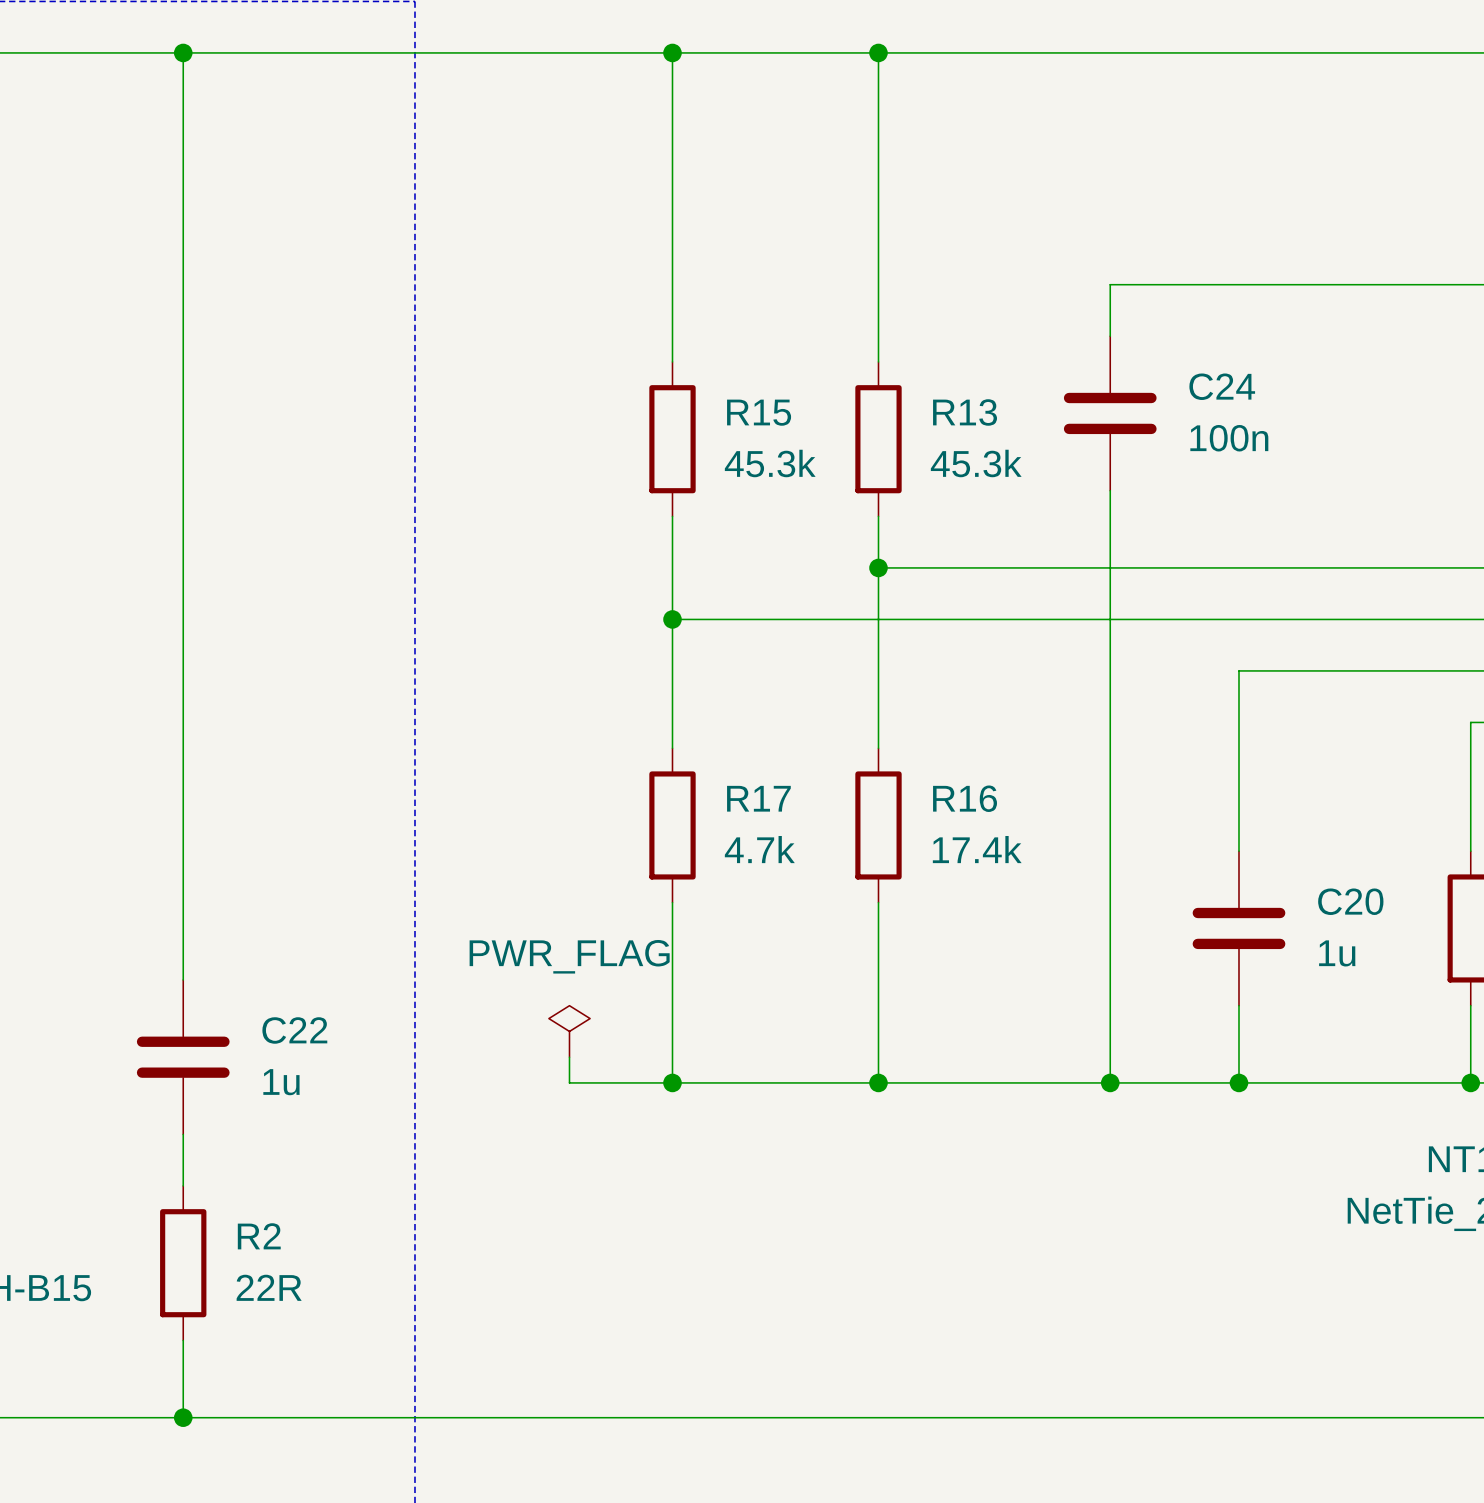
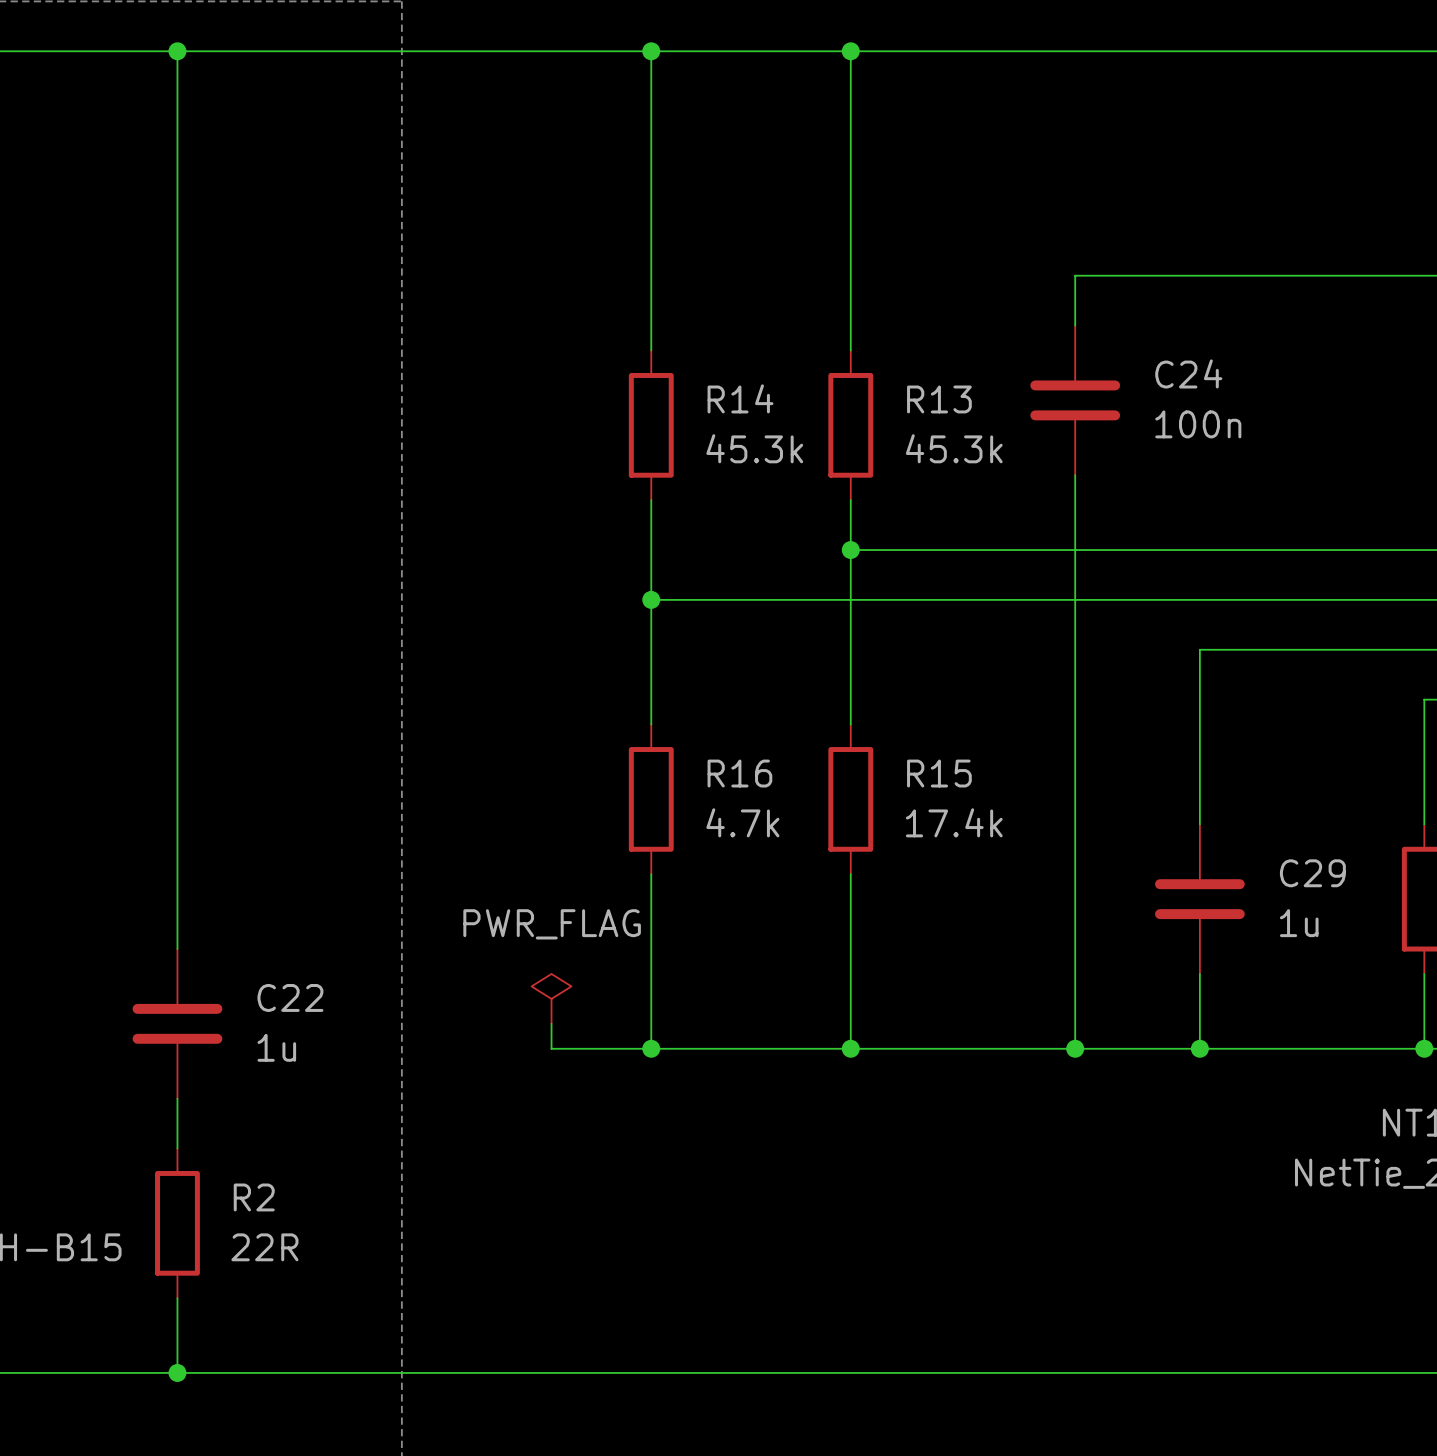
R15 name: R15 (759, 412) -> R14 (740, 398)
R17 name: R17 (758, 798) -> R16 (739, 773)
R16 name: R16 (965, 798) -> R15 (939, 773)
C20 name: C20 (1350, 901) -> C29 (1312, 873)

